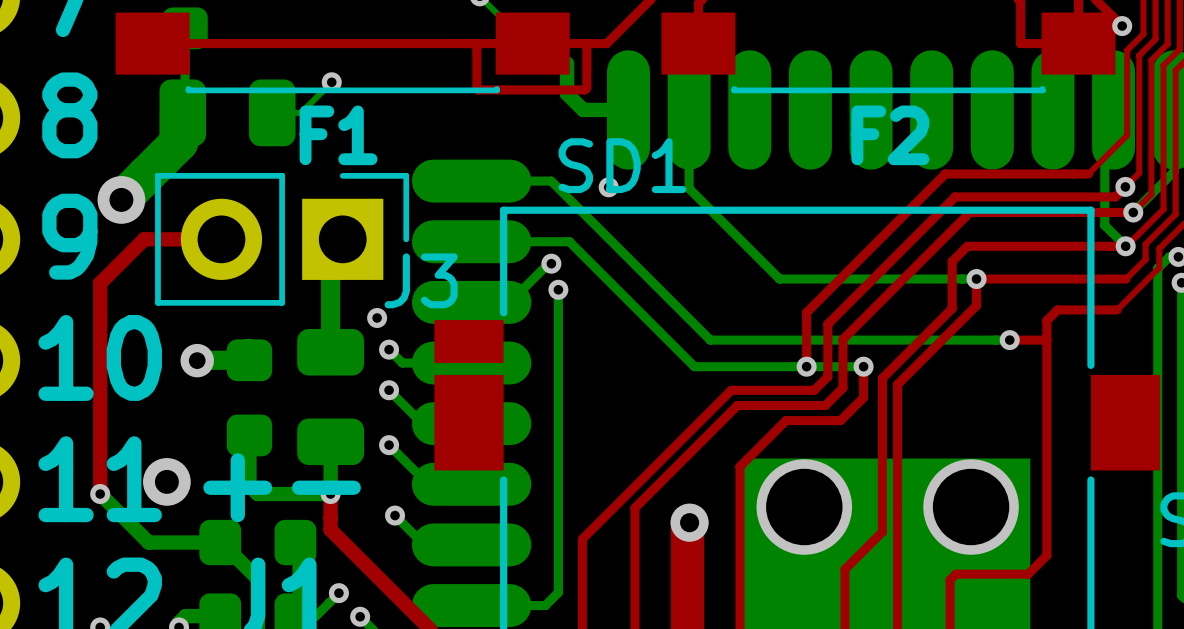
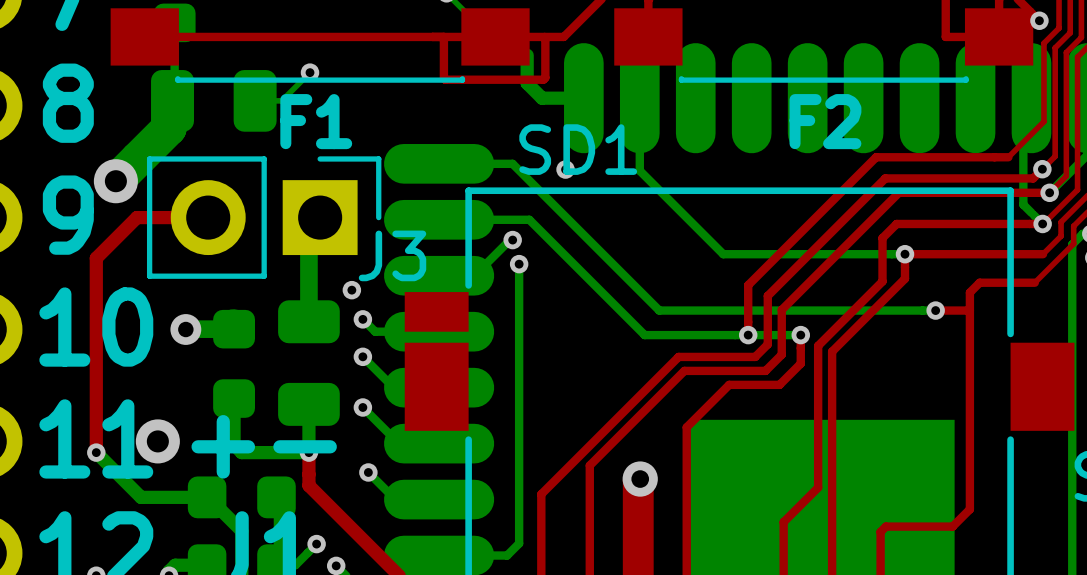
via: (804, 507) -> none
via: (971, 507) -> none

